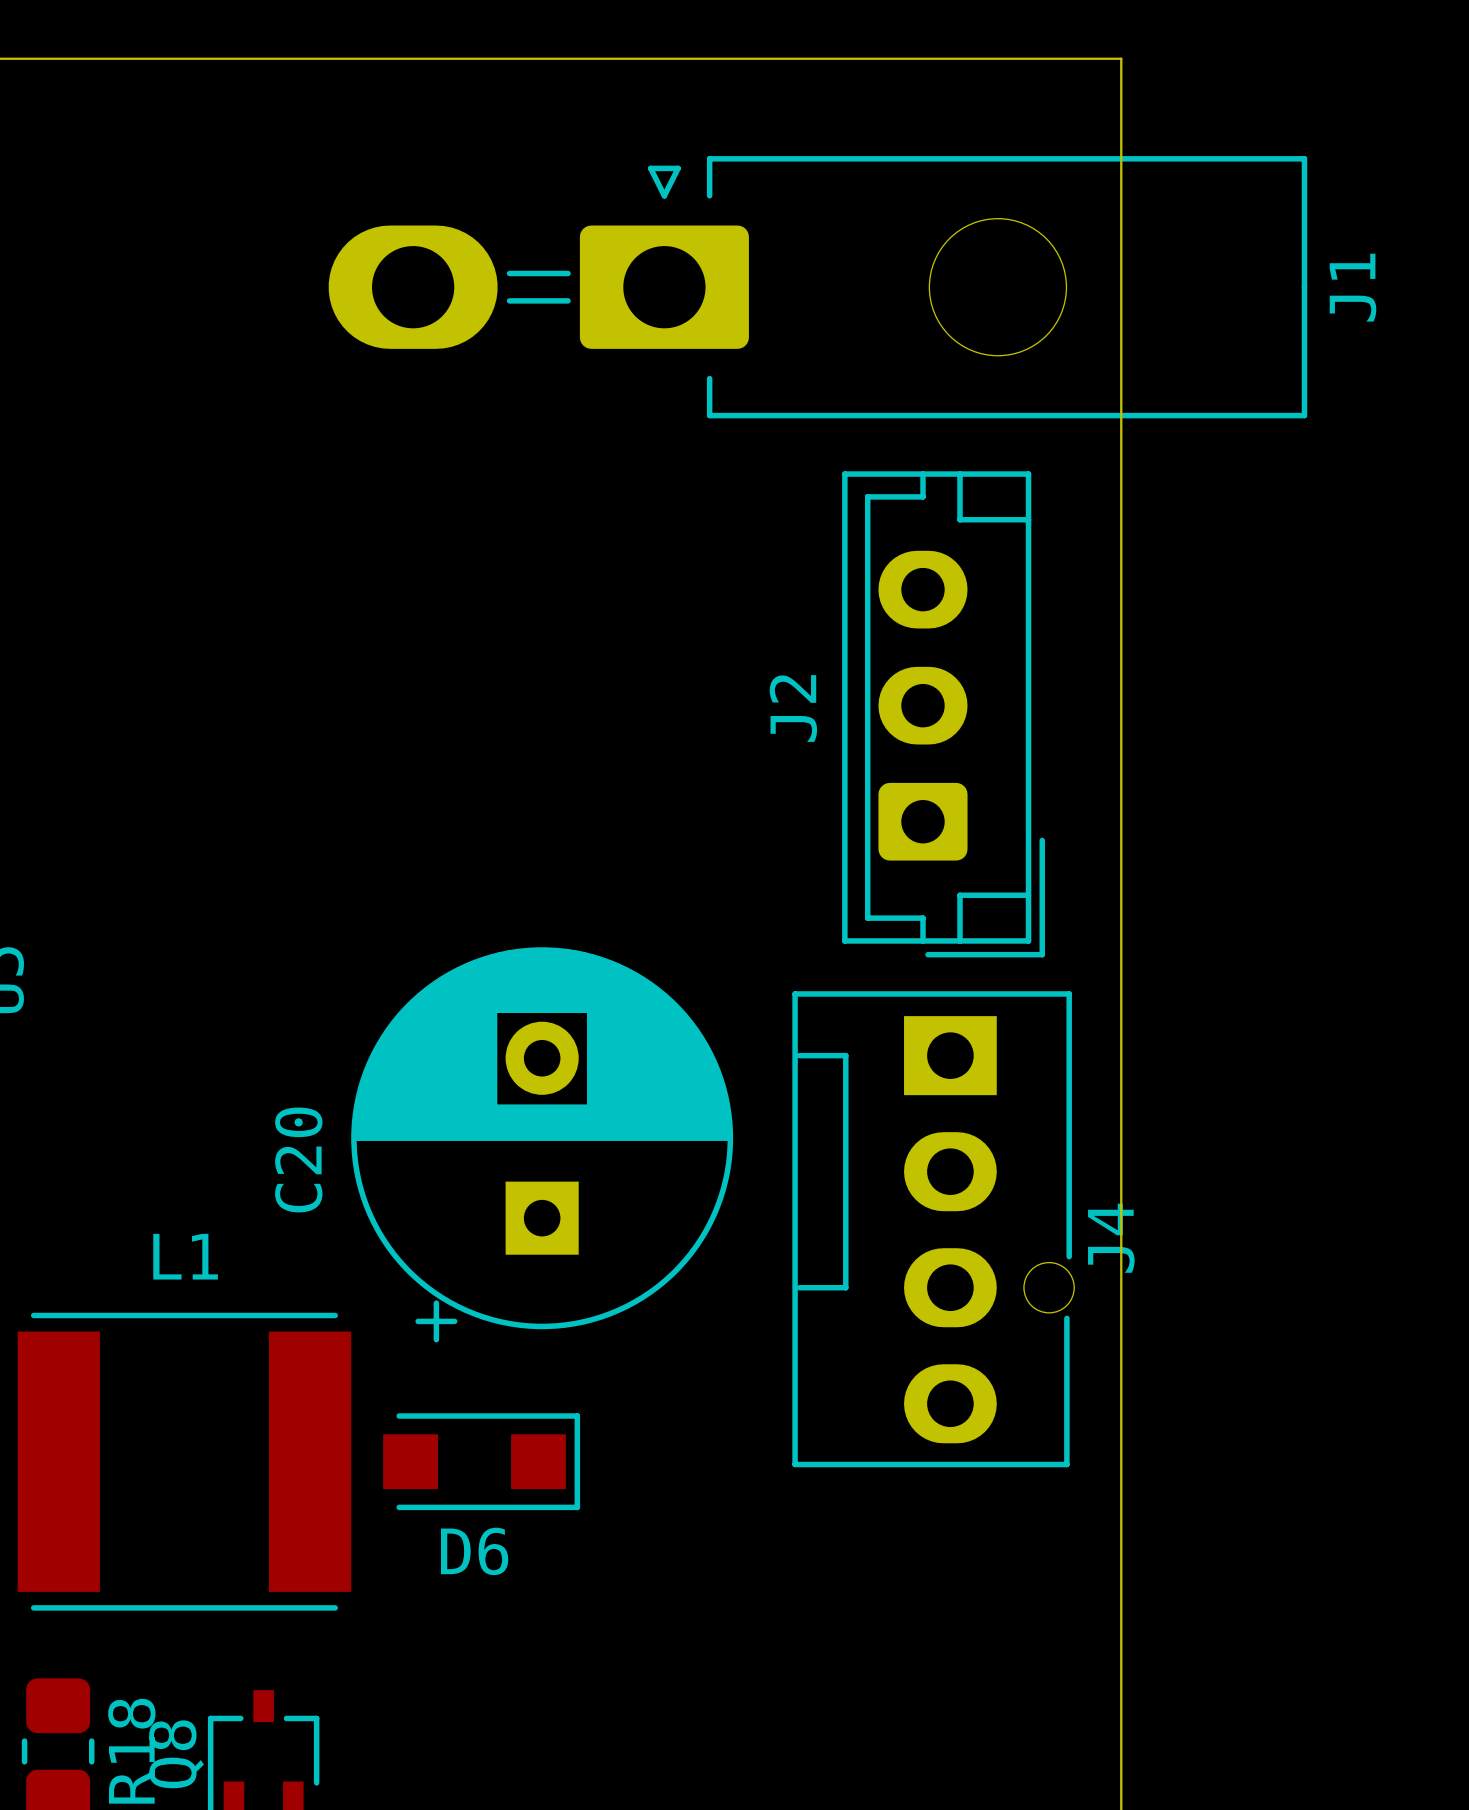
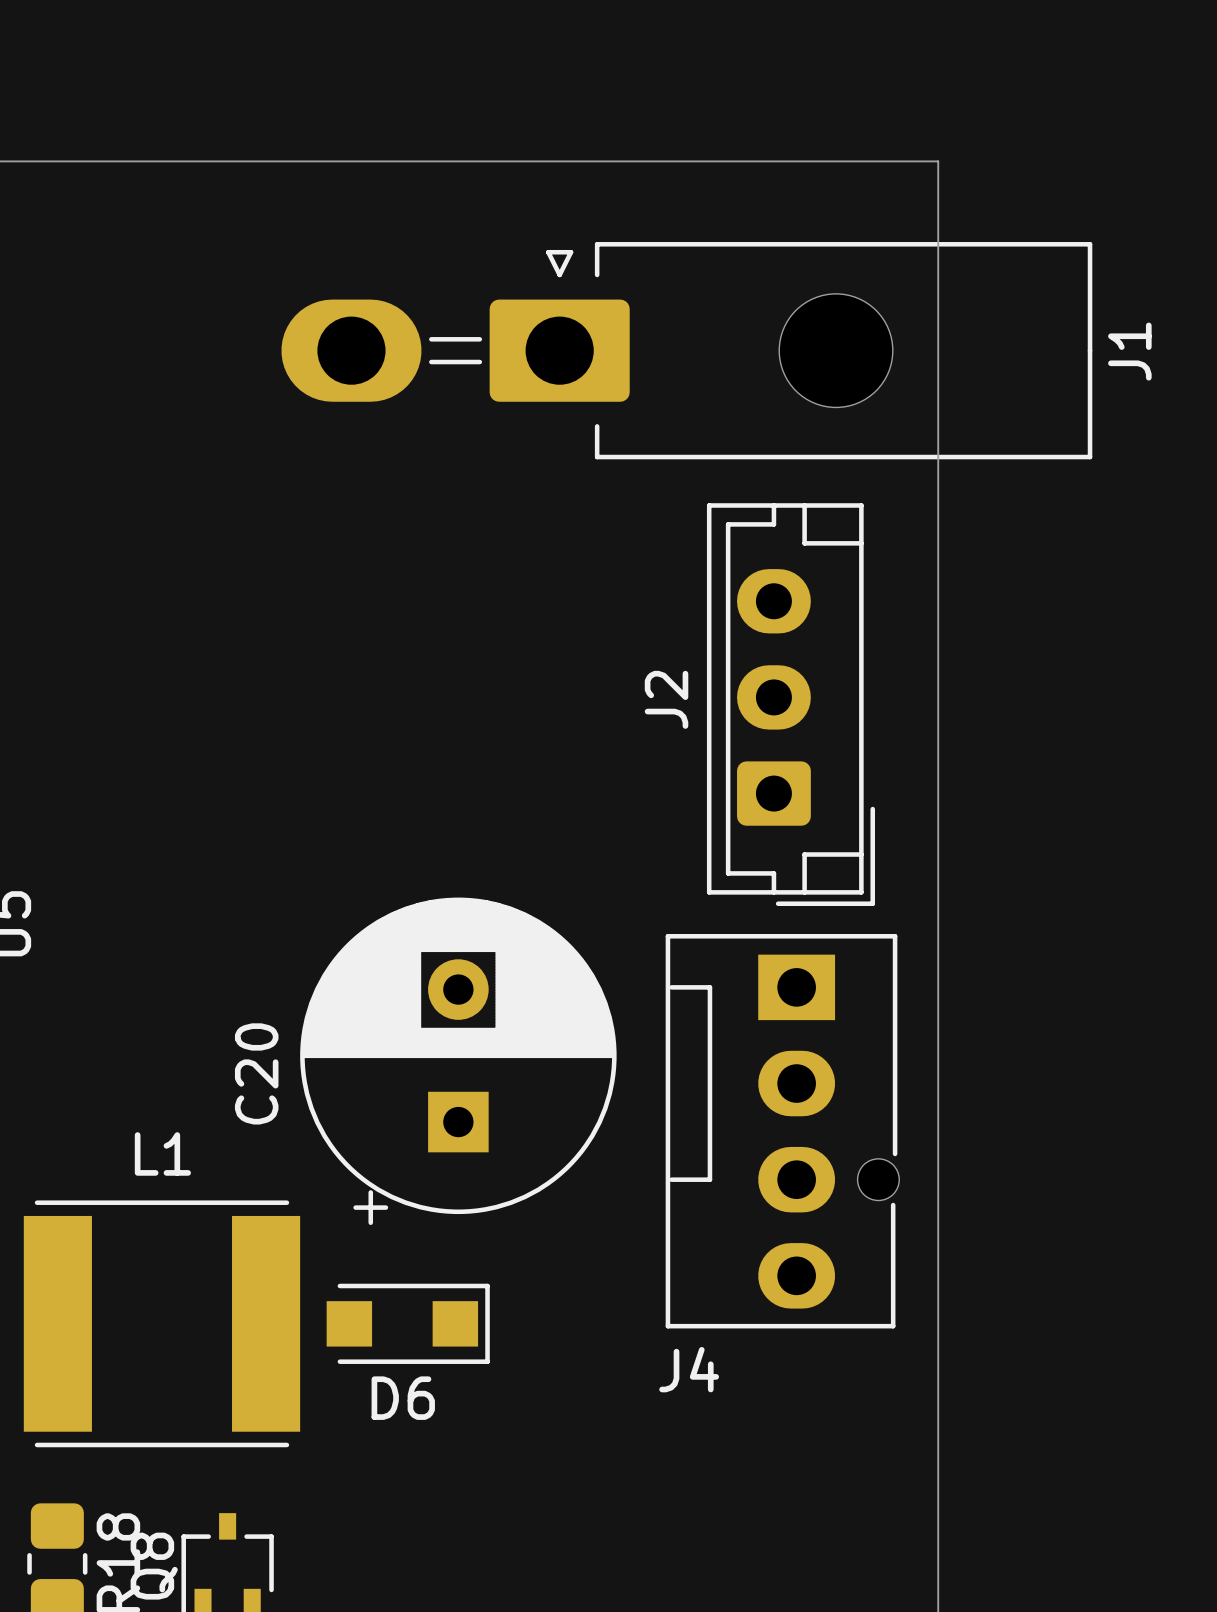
J4 name rotation: 0° (1111, 1238) -> 90° clockwise (689, 1369)
J4 name position: J4 (1111, 1238) -> J4 (689, 1369)

